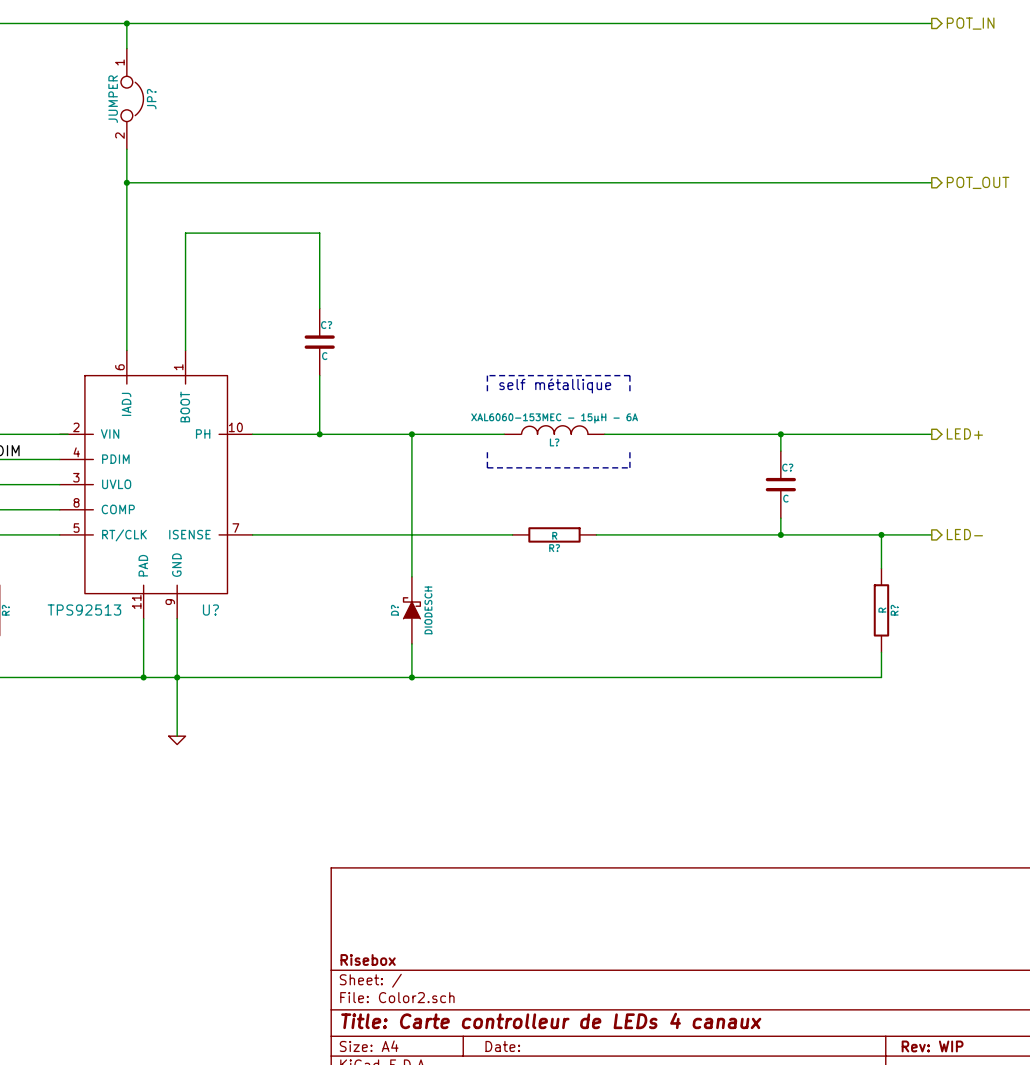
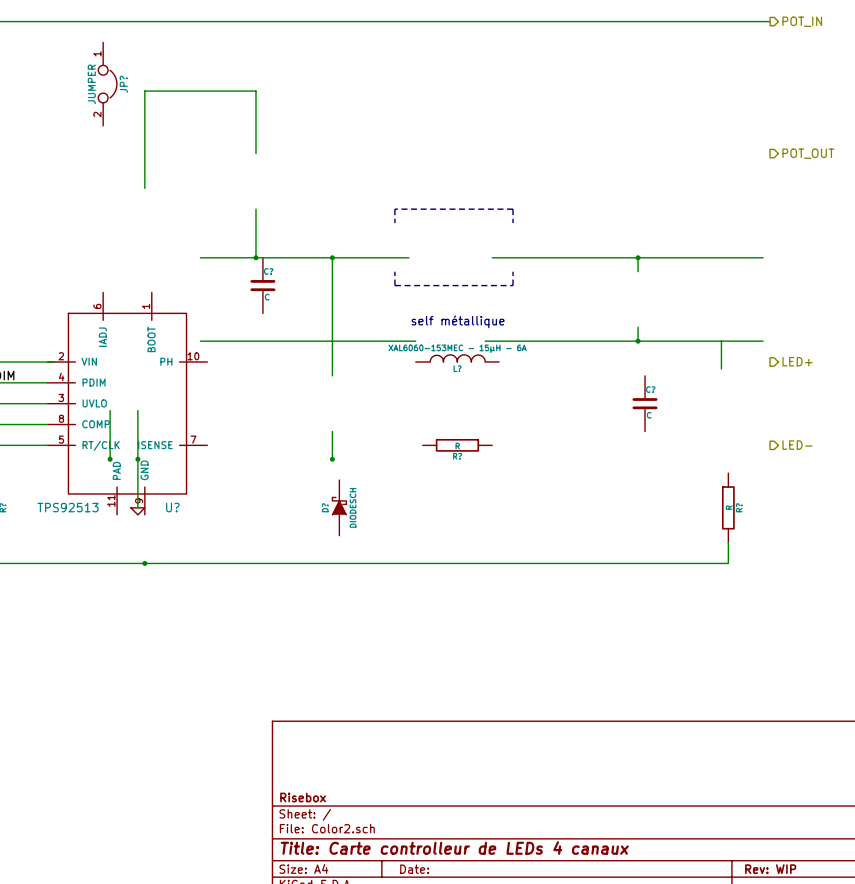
wire: (126, 23) (126, 48) -> none
junction: (126, 23) -> none
wire: (126, 149) (126, 350) -> none
wire: (126, 182) (931, 182) -> none
junction: (126, 182) -> none
junction: none -> (255, 257)
wire: (319, 308) (319, 233) (185, 233) (185, 350) -> (255, 153) (255, 91) (144, 91) (144, 188)
junction: none -> (332, 257)
junction: none -> (638, 257)
wire: (319, 375) (319, 434) -> (255, 209) (255, 257)
line: (487, 392) (487, 375) (629, 375) (629, 392) -> (394, 223) (394, 209) (513, 209) (513, 223)
wire: (252, 434) (504, 434) -> (200, 257) (408, 257)
junction: (319, 434) -> none
wire: (411, 434) (411, 576) -> (332, 257) (332, 375)
junction: (411, 434) -> none
wire: (604, 434) (931, 434) -> (492, 257) (763, 257)
wire: (780, 434) (780, 451) -> (638, 257) (638, 271)
junction position: (780, 434) -> (638, 341)
line: (487, 451) (487, 467) (629, 467) (629, 451) -> (394, 271) (394, 285) (513, 285) (513, 271)
wire: (780, 518) (780, 534) -> (638, 327) (638, 341)
wire: (252, 534) (512, 534) -> (200, 341) (415, 341)
wire: (596, 534) (931, 534) -> (485, 341) (763, 341)
junction: (780, 534) -> none
wire: (881, 534) (881, 568) -> (721, 341) (721, 368)
junction: (881, 534) -> none
junction: none -> (110, 459)
junction: none -> (137, 459)
junction: none -> (332, 459)
wire: (143, 618) (143, 677) -> (110, 410) (110, 459)
wire: (177, 618) (177, 736) -> (137, 410) (137, 507)
wire: (411, 643) (411, 677) -> (332, 431) (332, 459)
junction: (143, 677) -> none
junction: (411, 677) -> none
power symbol position: (177, 740) -> (137, 511)

